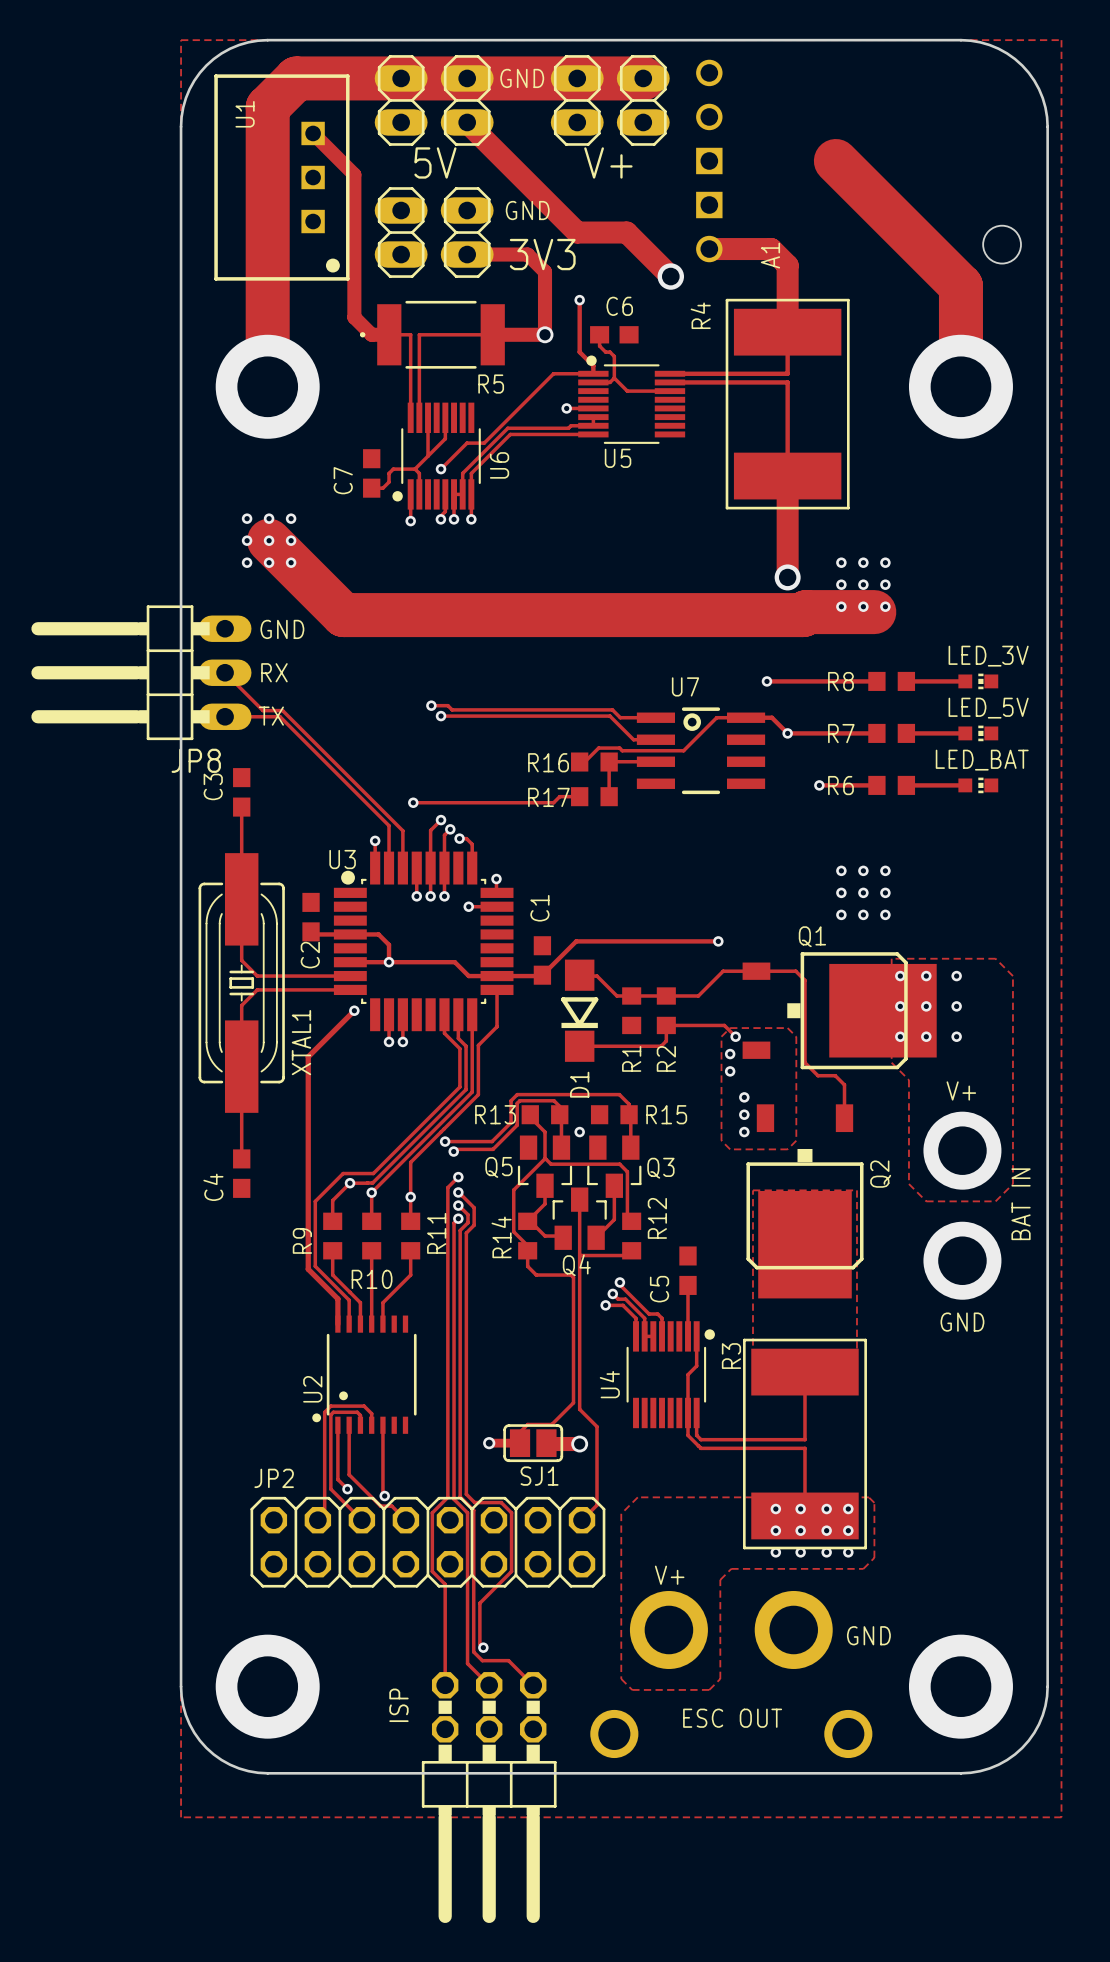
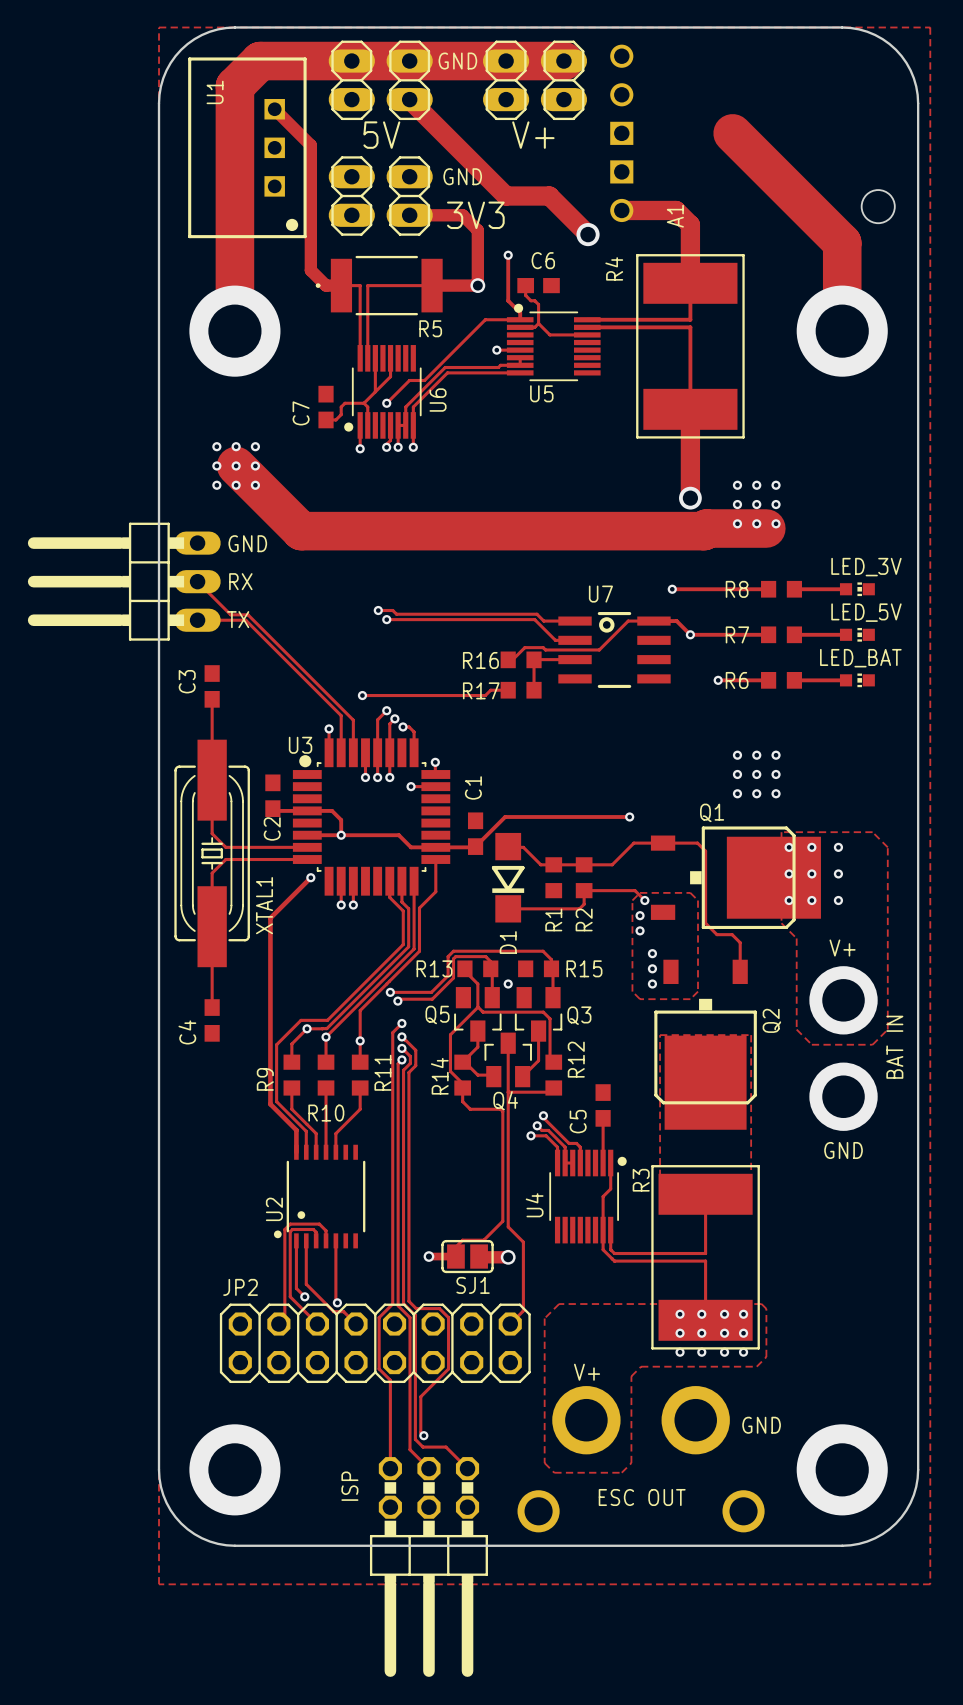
JP8 name: JP8 (196, 760) -> none

